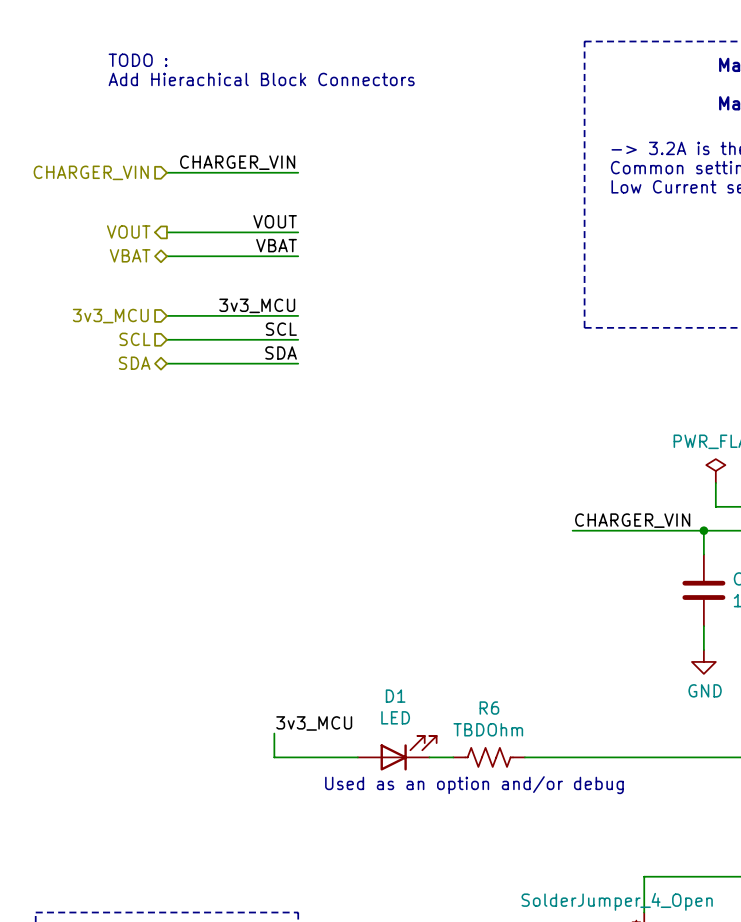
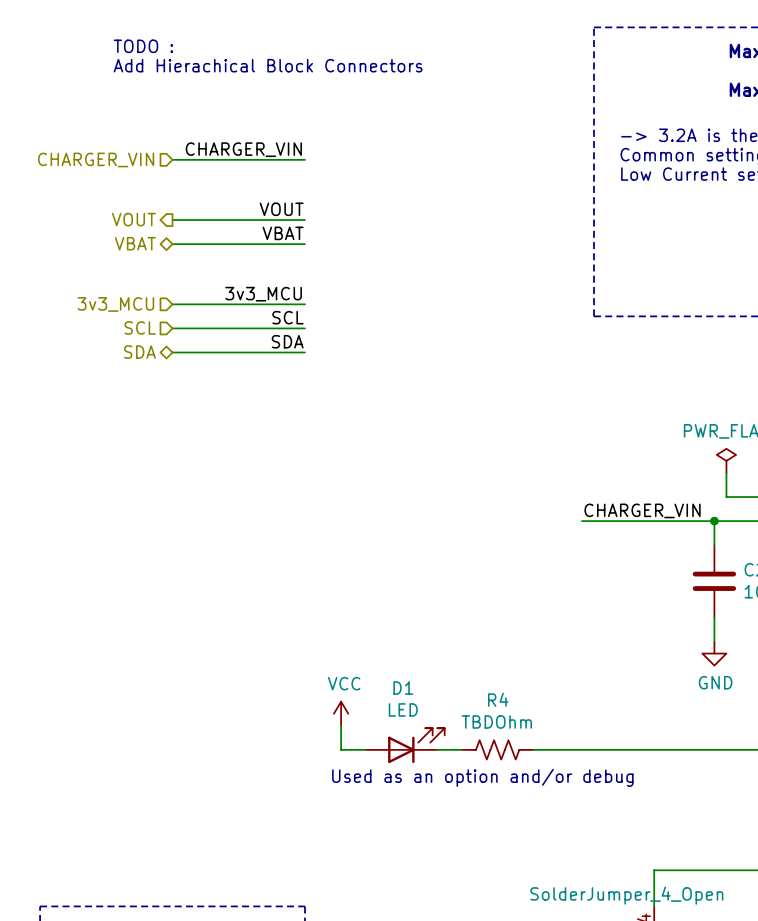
R6 name: R6 (489, 708) -> R4 (498, 699)
power symbol: none -> VCC (341, 713)
label: 3v3_MCU (314, 723) -> none
wire: (274, 733) (274, 757) (334, 757) -> (341, 725) (341, 749)

